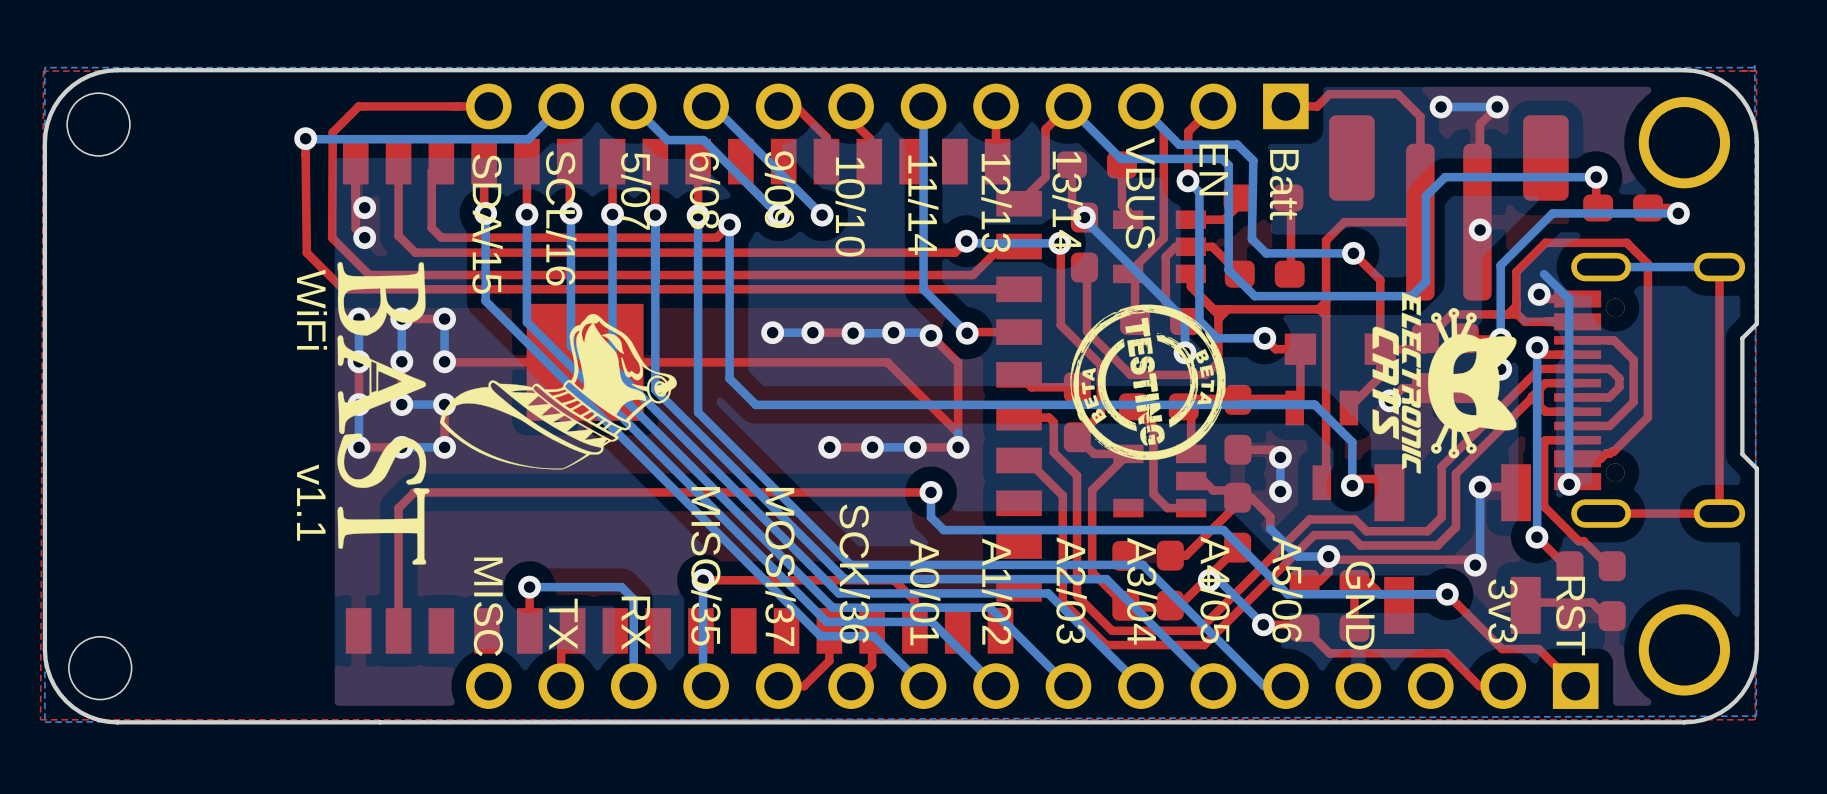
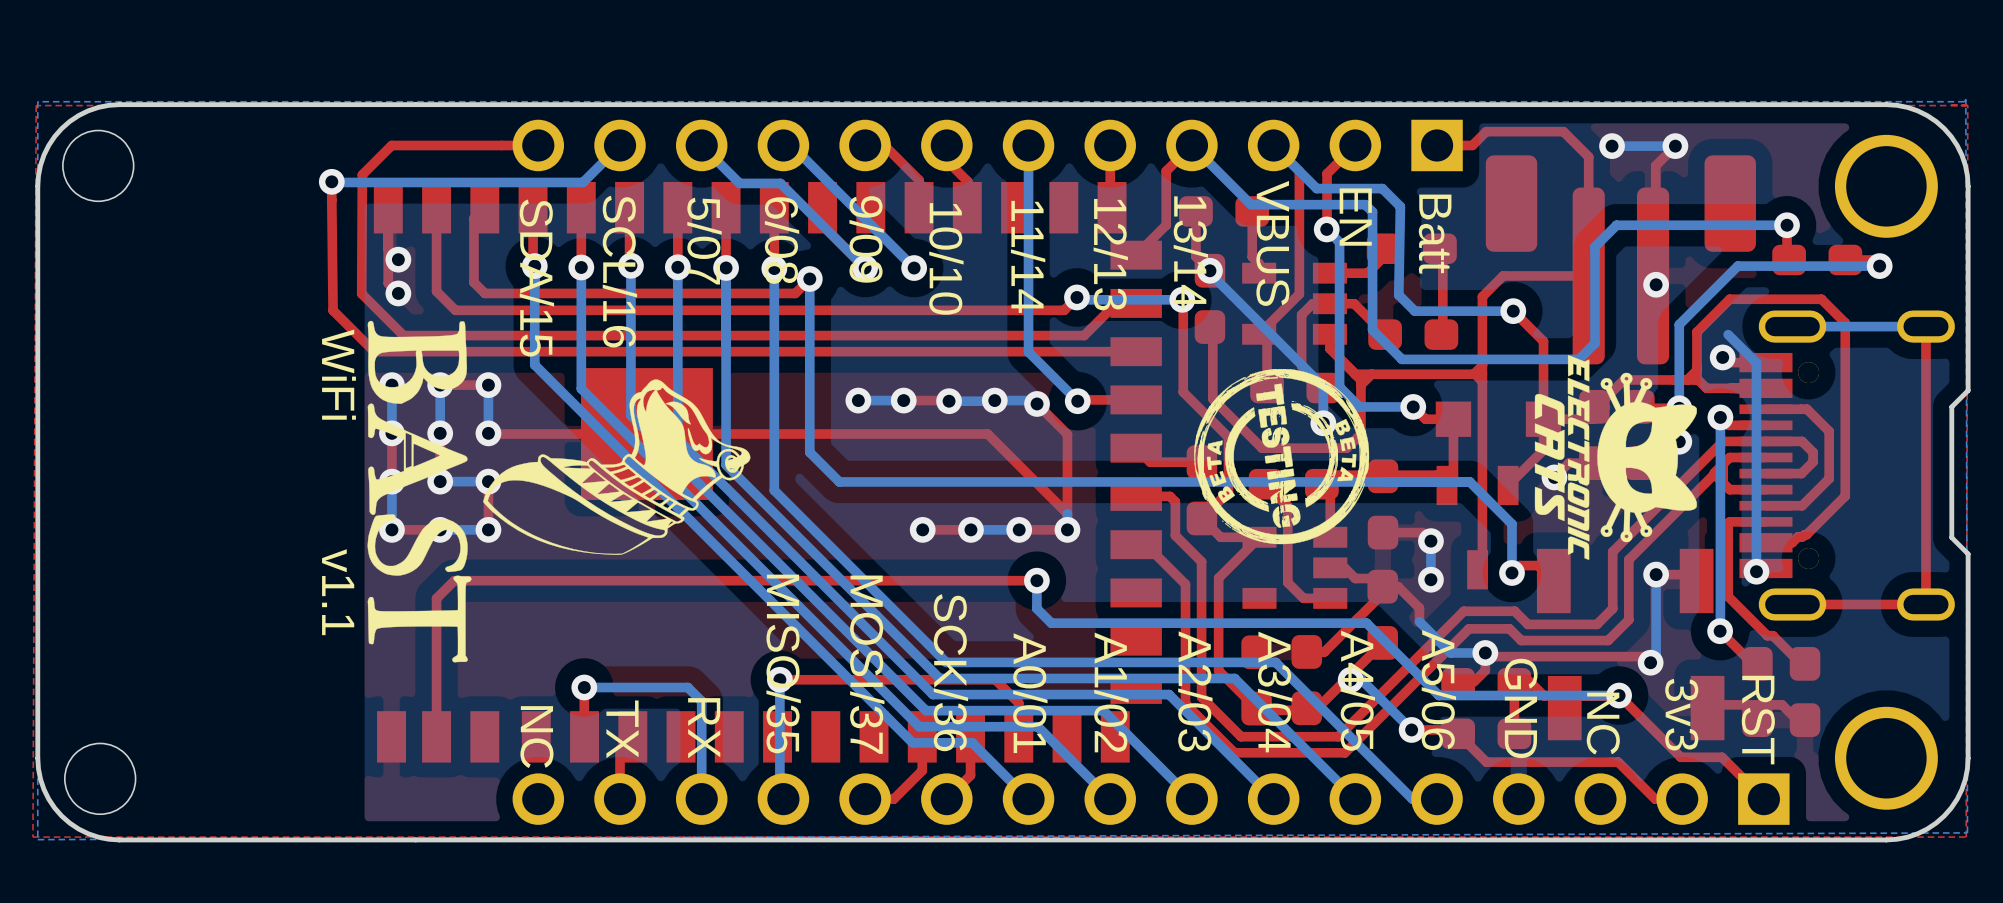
text: MISC (488, 606) -> NC (536, 737)
text: none -> NC (1603, 723)

